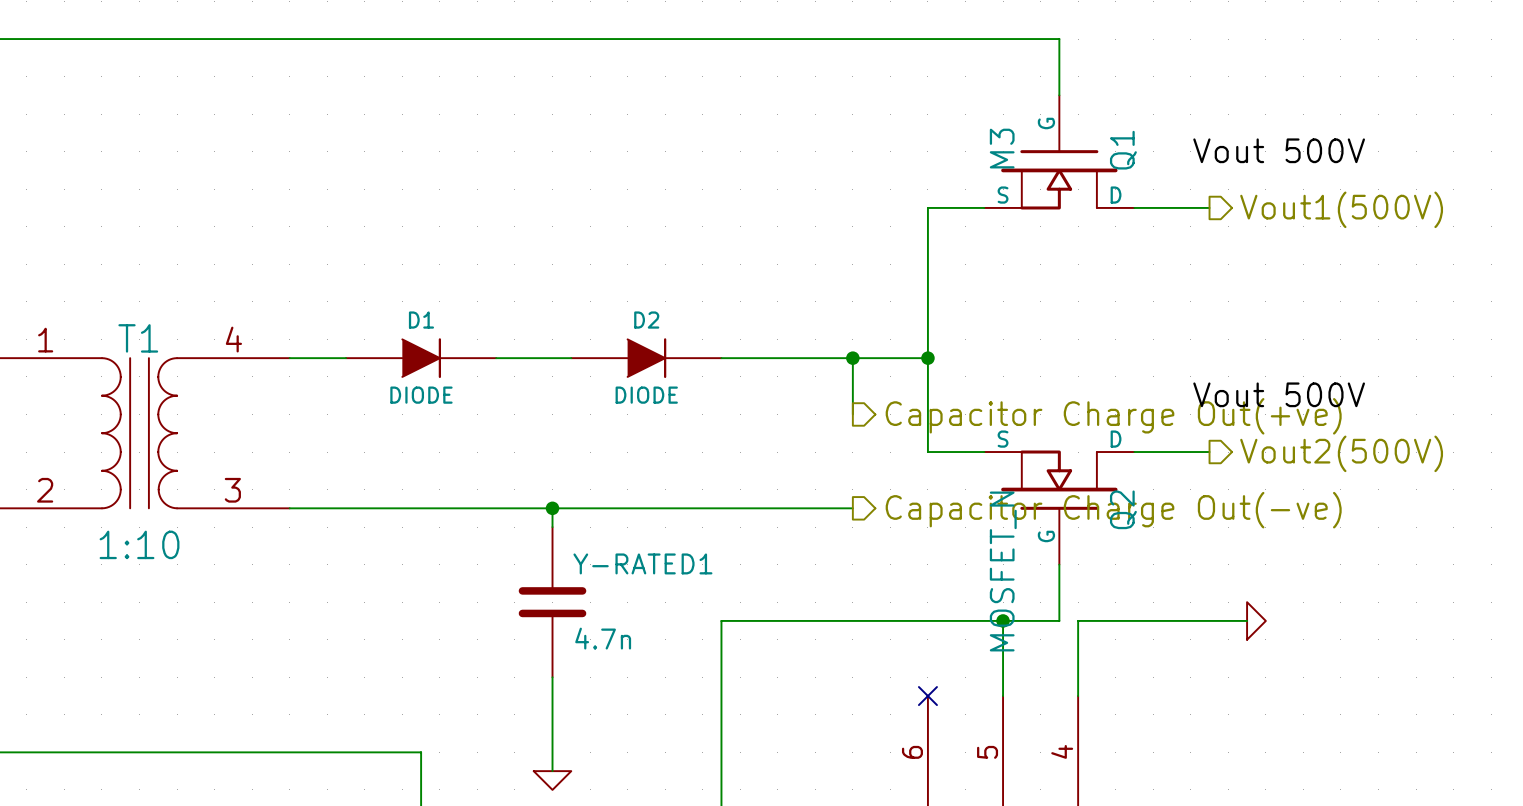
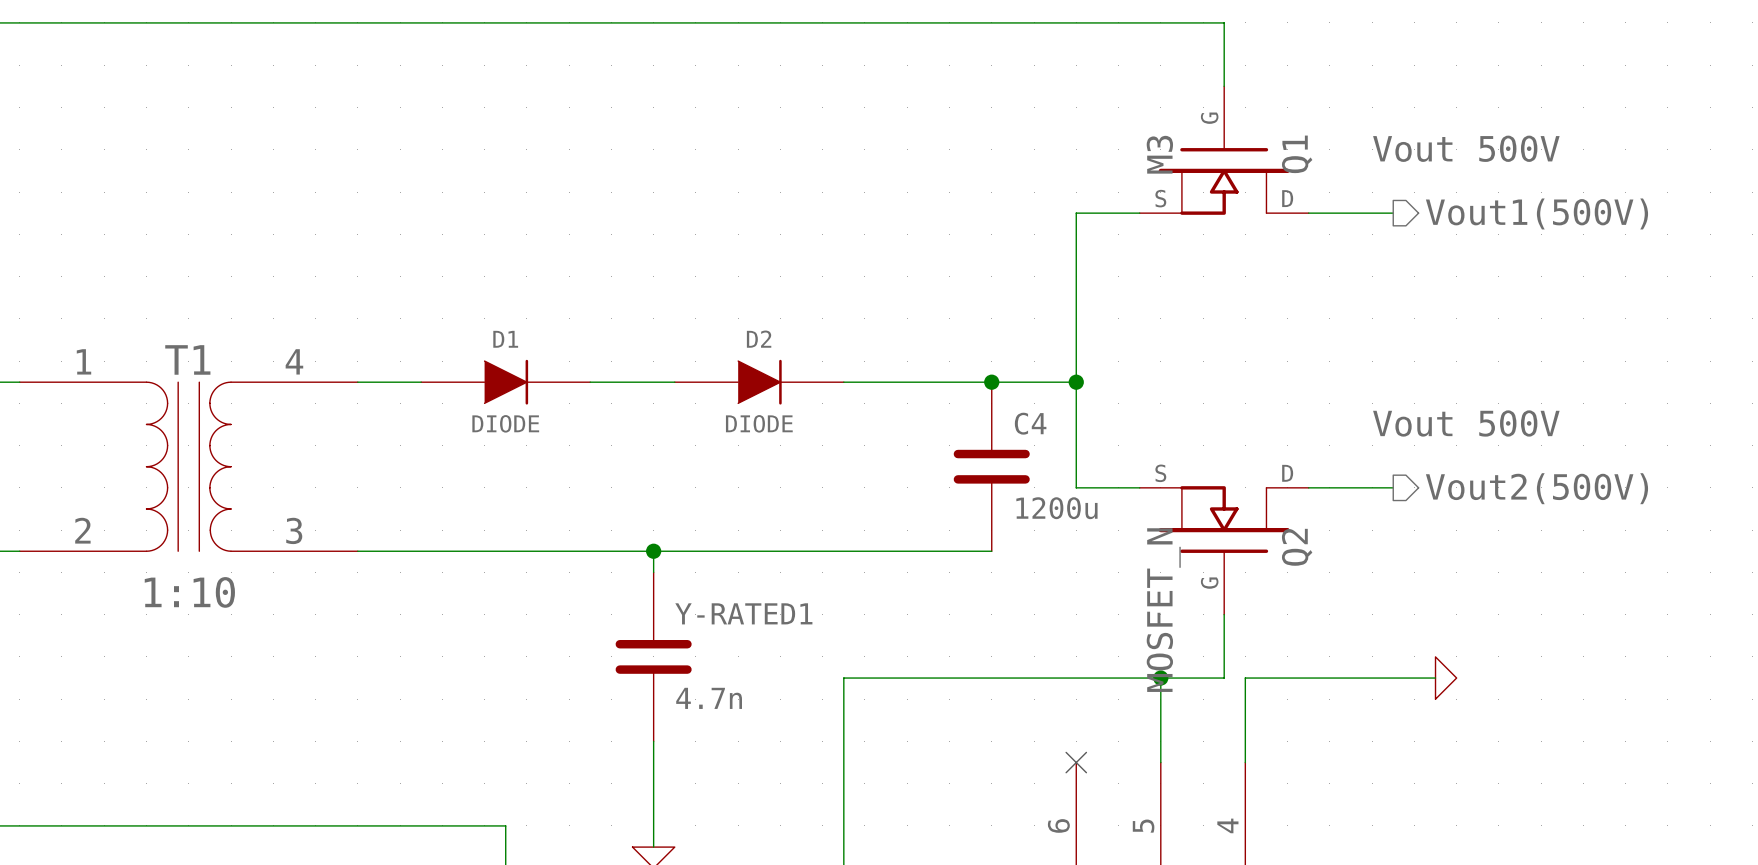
hierarchical label: Capacitor Charge Out(+ve) (1113, 416) -> none
C4: none -> 1200u (991, 466)
hierarchical label: Capacitor Charge Out(-ve) (1113, 510) -> none

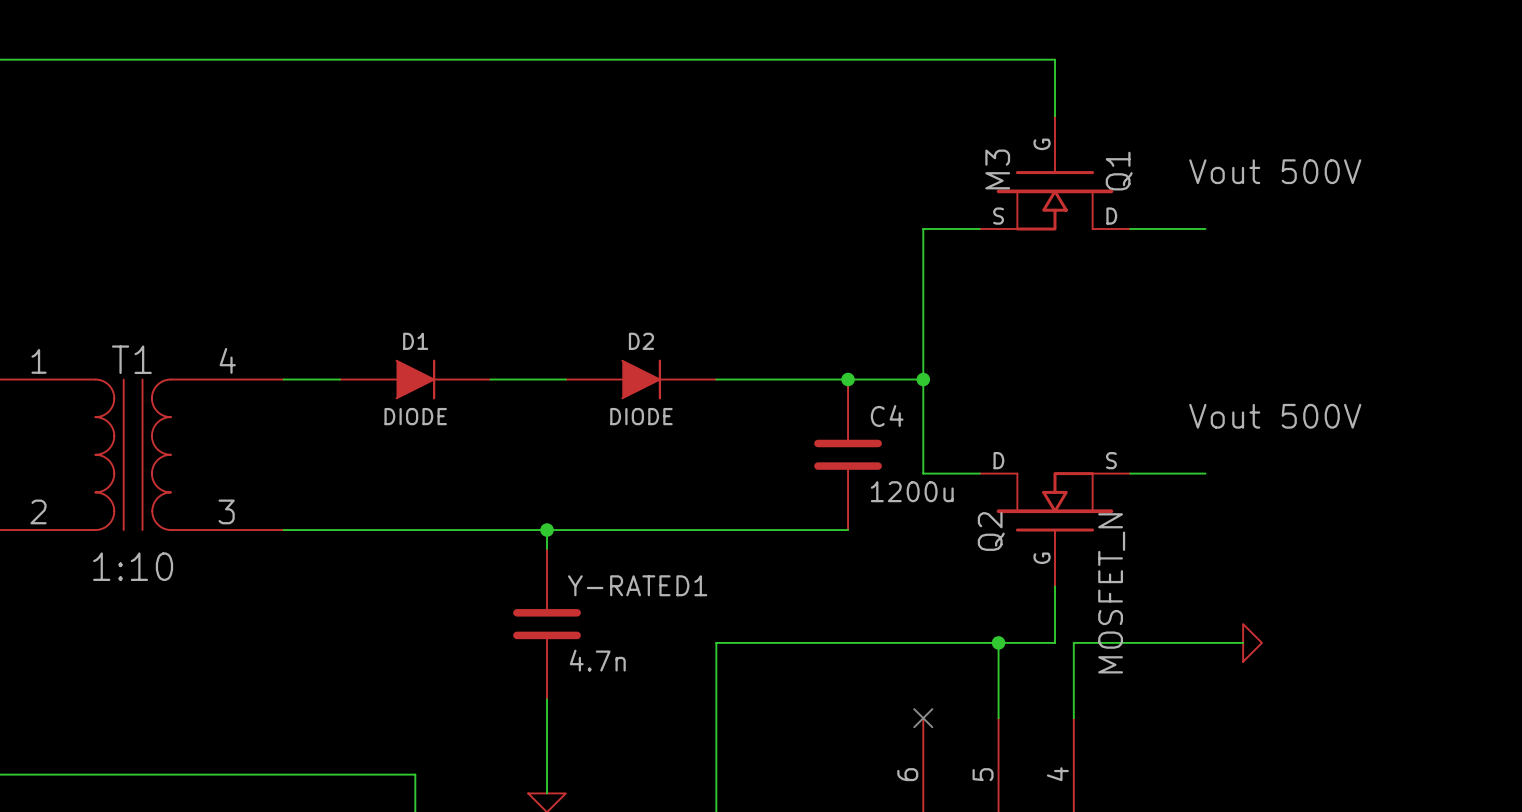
hierarchical label: Vout1(500V) (1536, 213) -> none
hierarchical label: Vout2(500V) (1536, 488) -> none
Q2 flip: as is (1224, 519) -> left-right (1054, 501)

